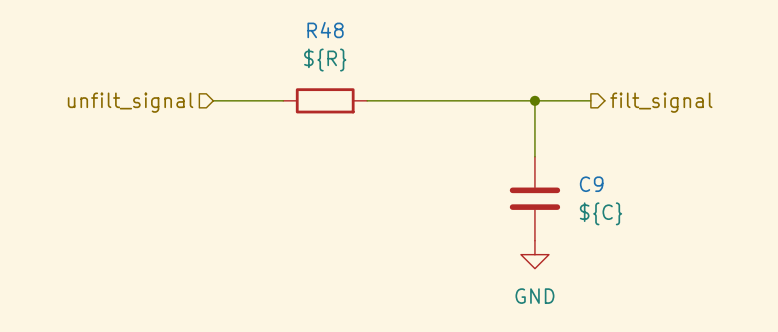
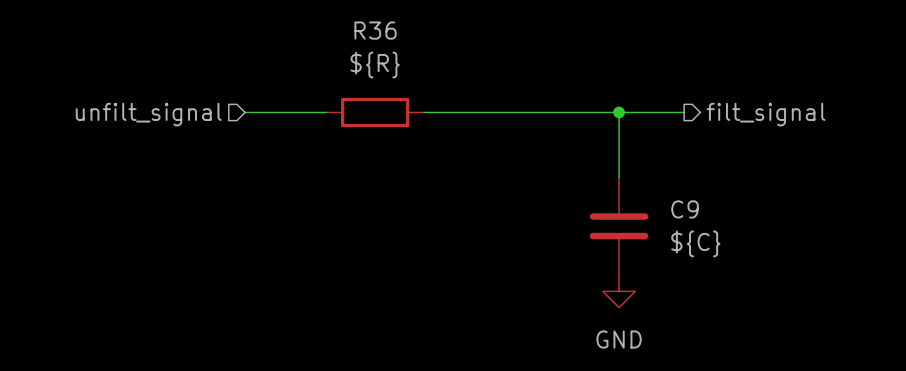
R48 name: R48 (325, 30) -> R36 (375, 30)

